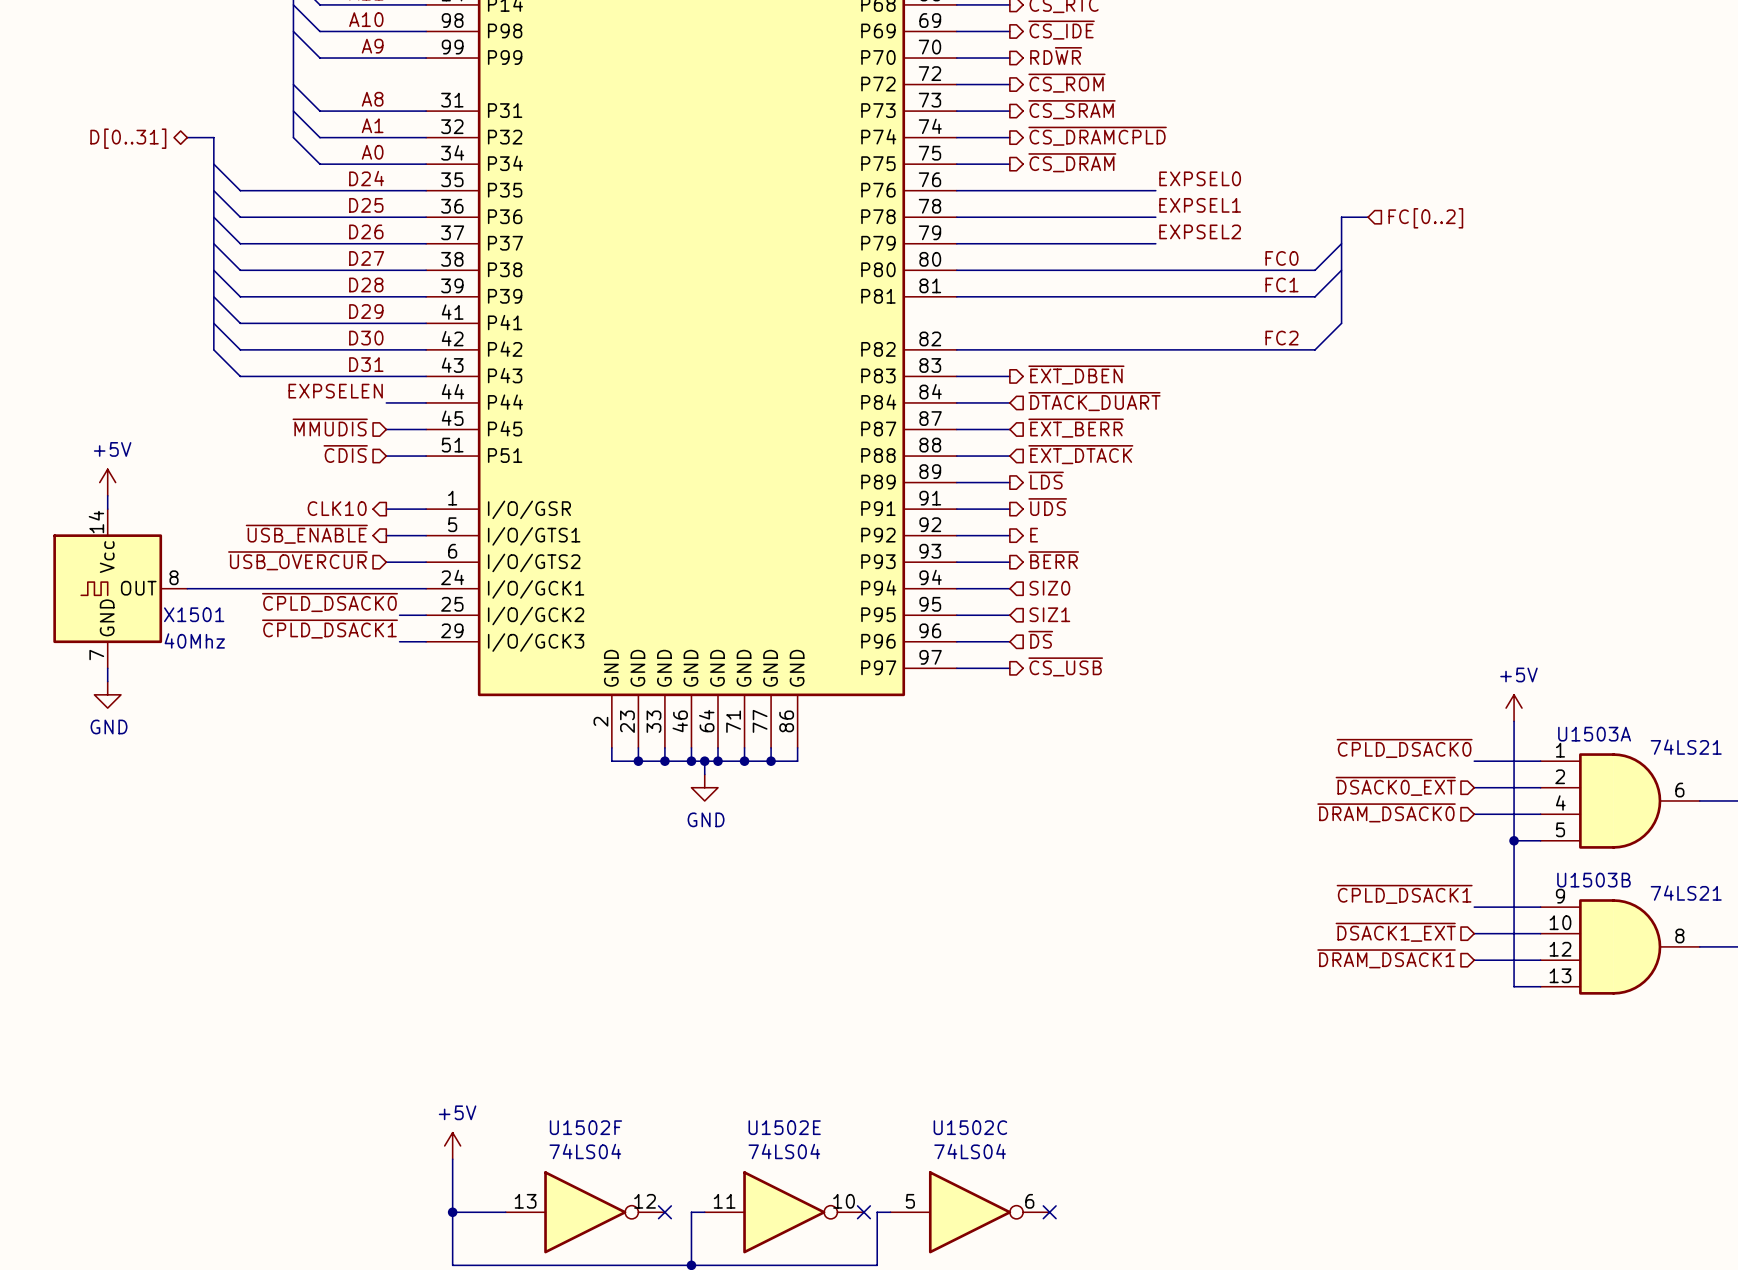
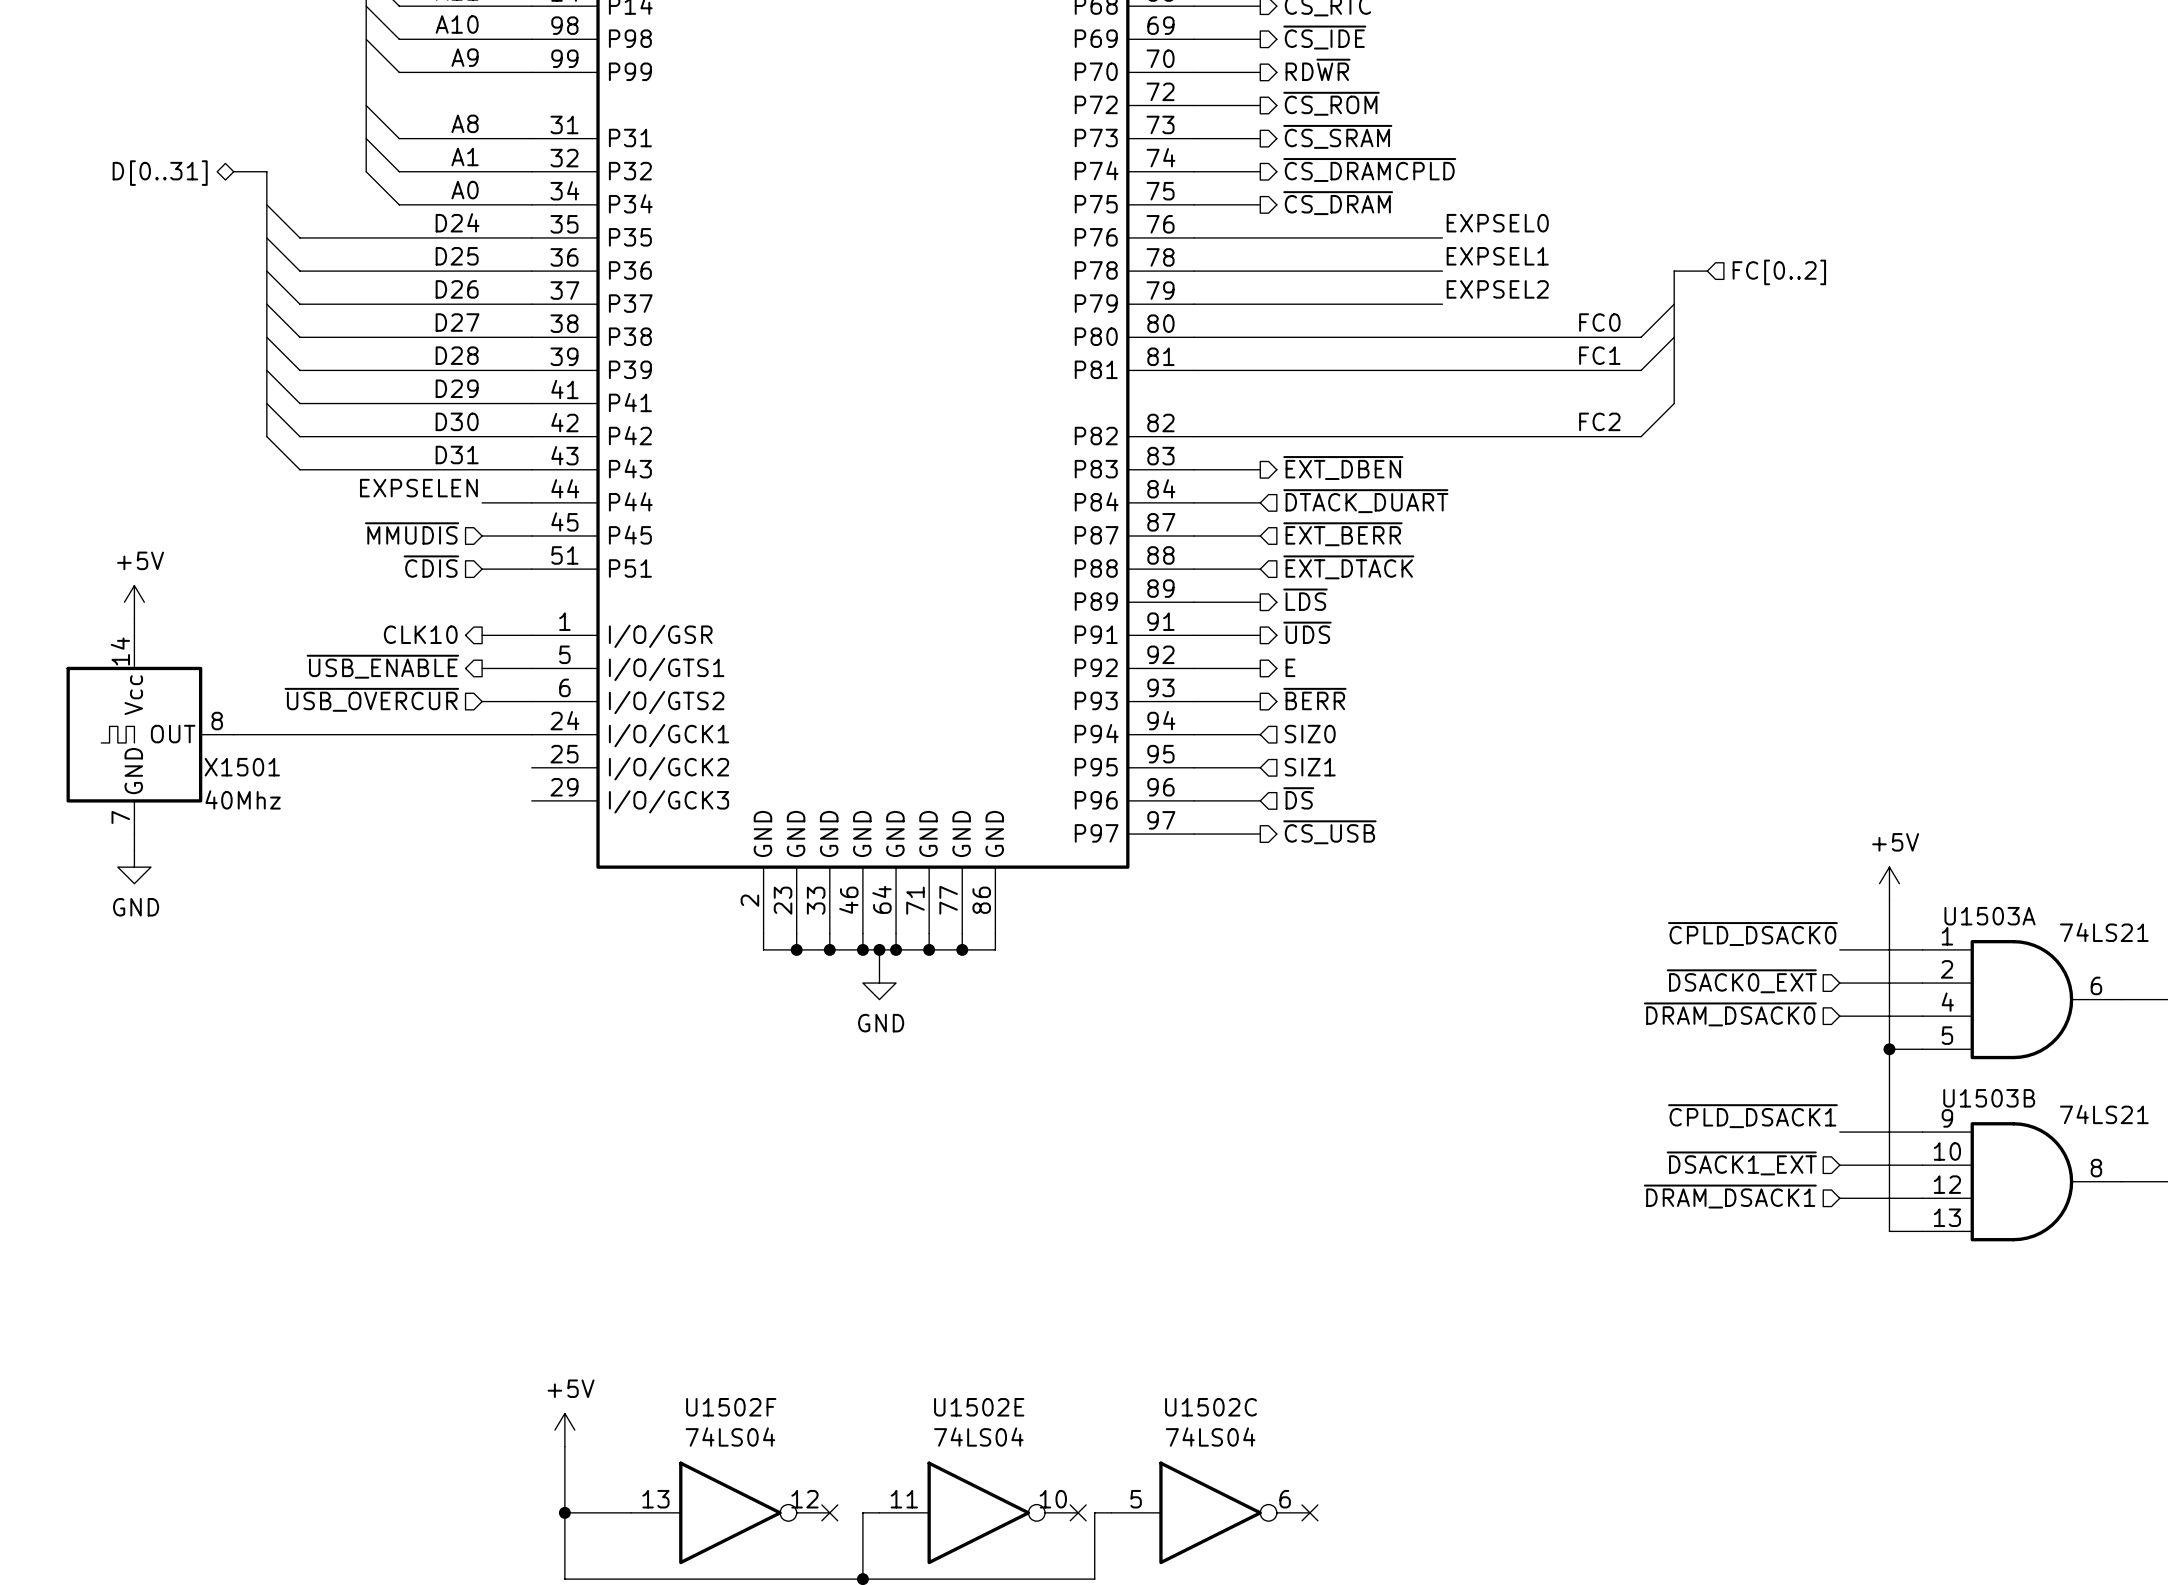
label: ~{CPLD_DSACK0} (329, 602) -> none
wire: (399, 615) (426, 615) -> none
label: ~{CPLD_DSACK1} (329, 629) -> none
wire: (399, 641) (426, 641) -> none

